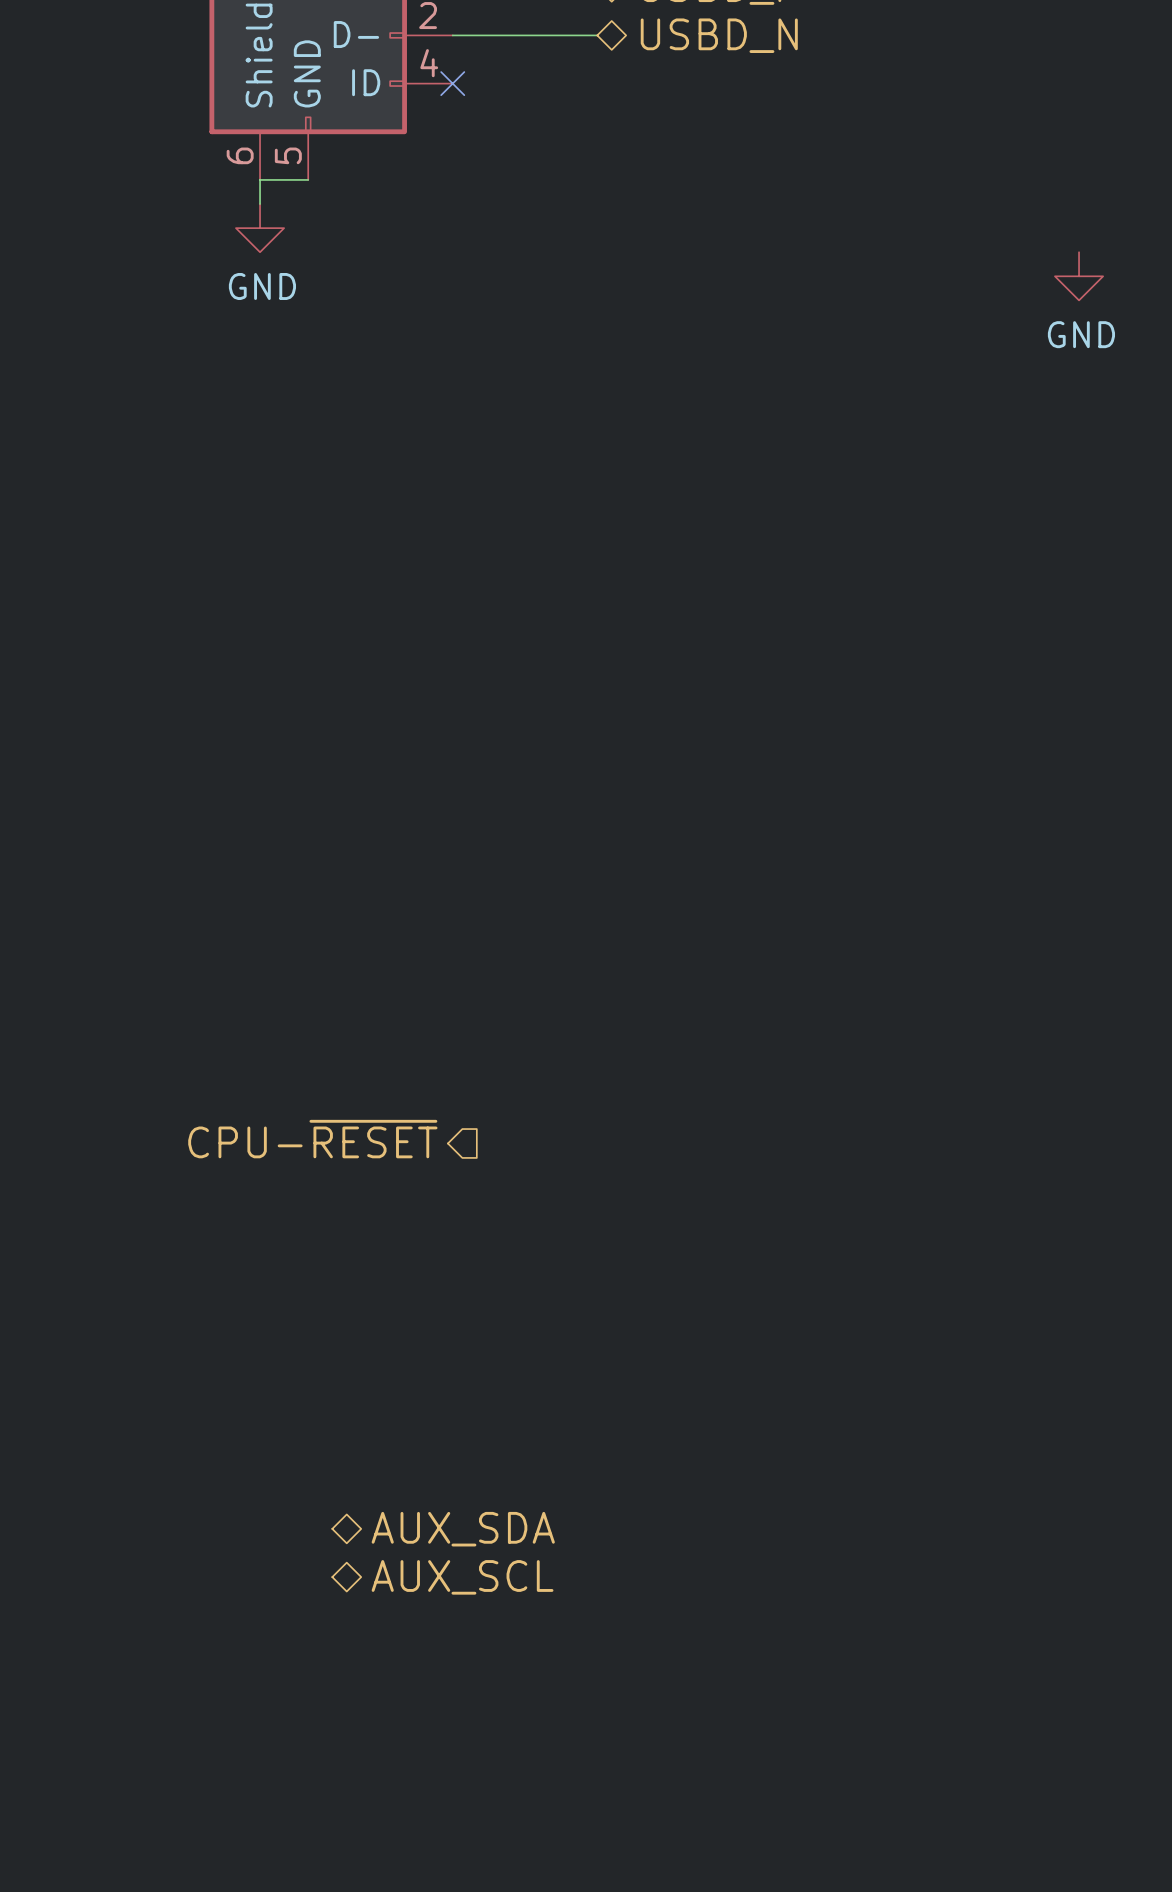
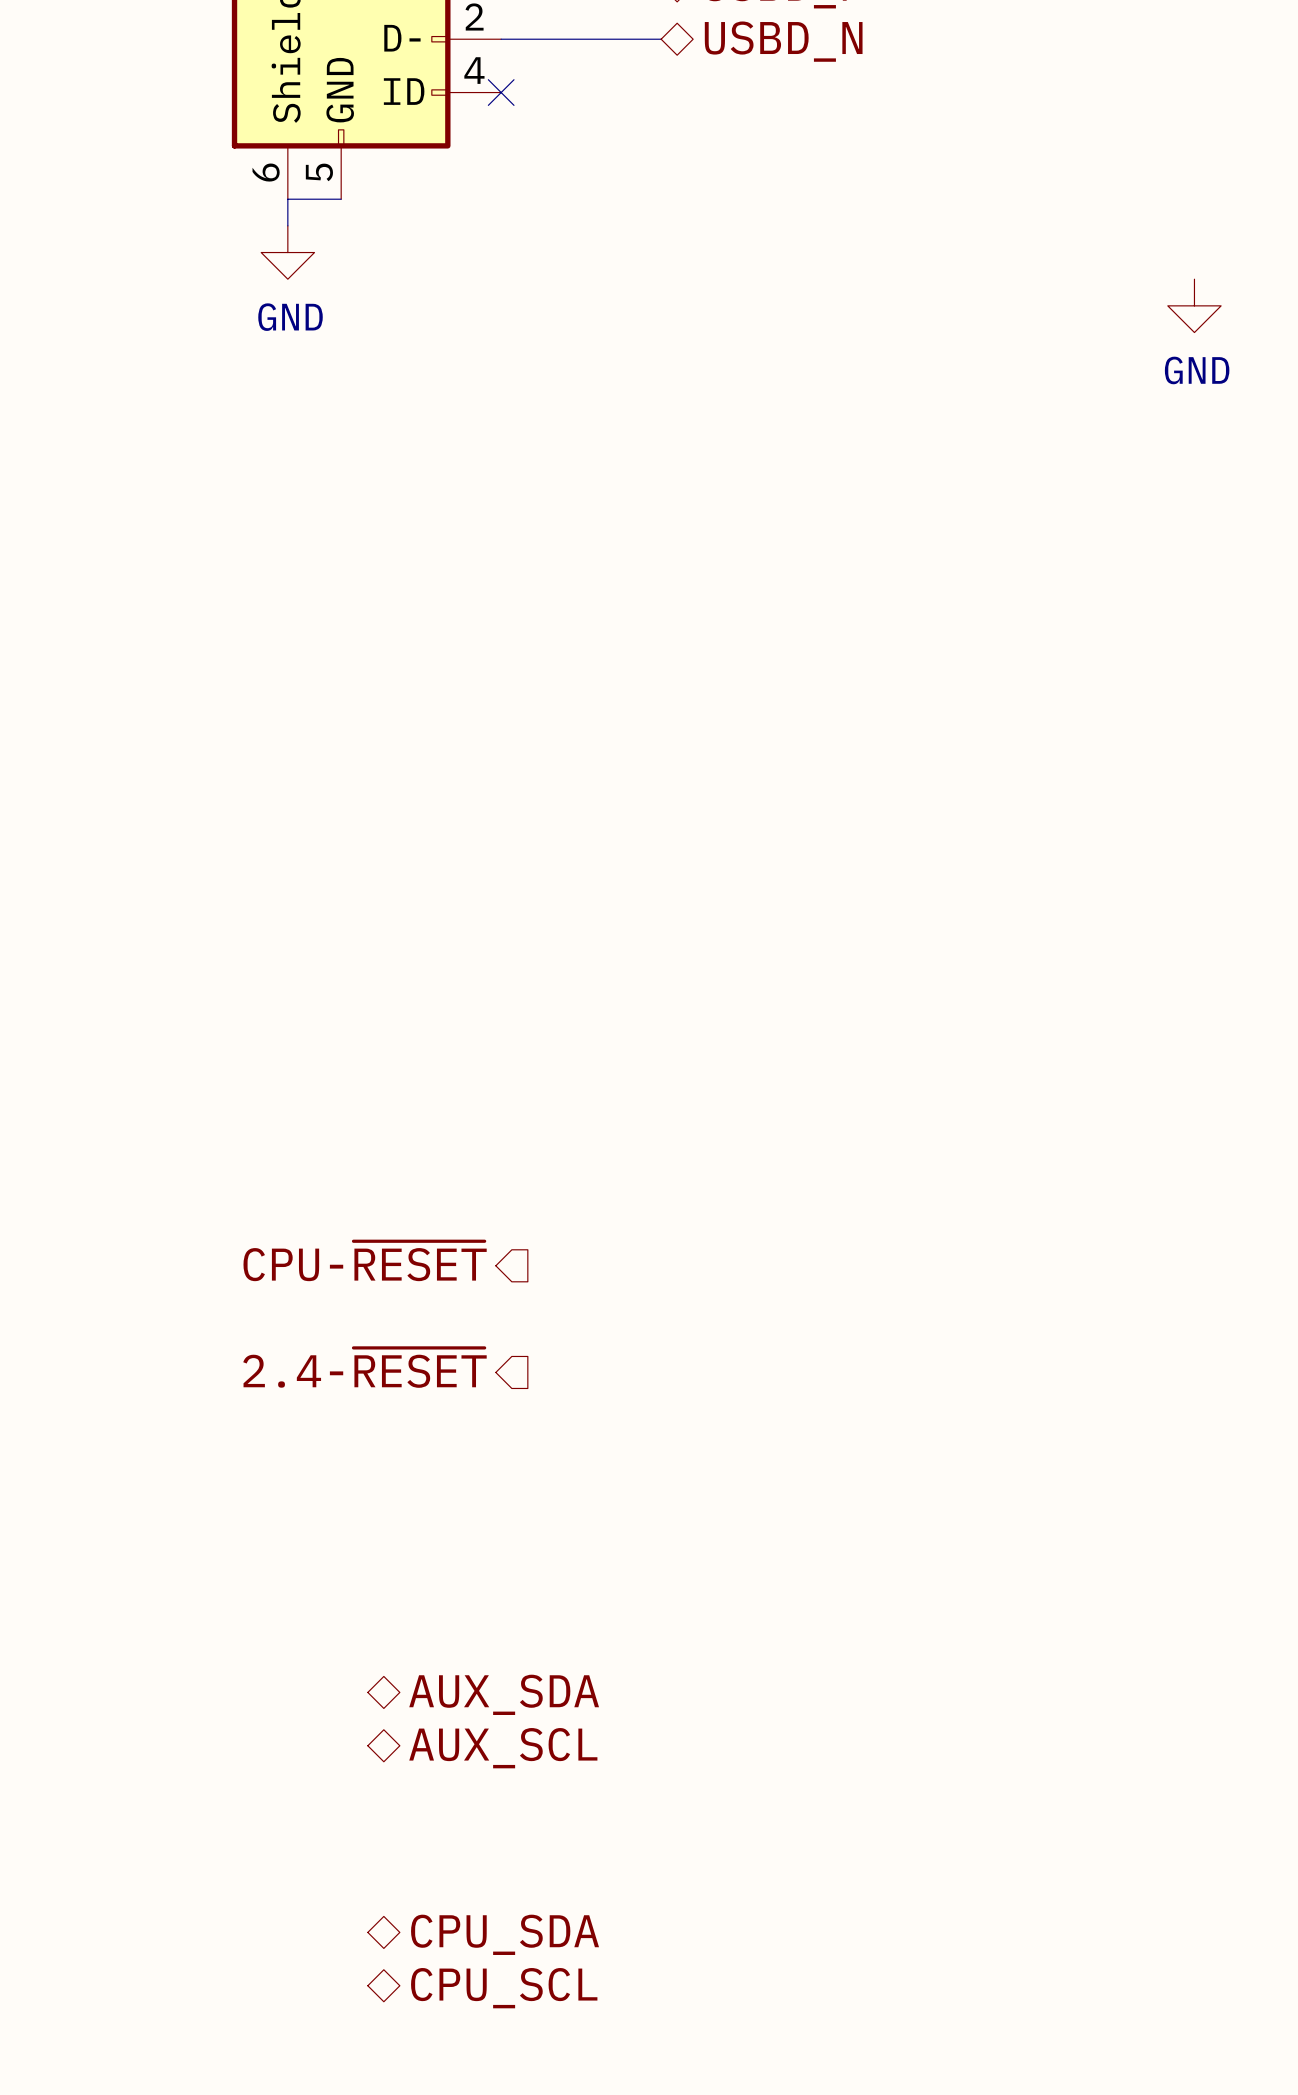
hierarchical label: none -> 2.4-~{RESET} (364, 1367)
hierarchical label: none -> CPU_SDA (505, 1934)
hierarchical label: none -> CPU_SCL (504, 1988)

